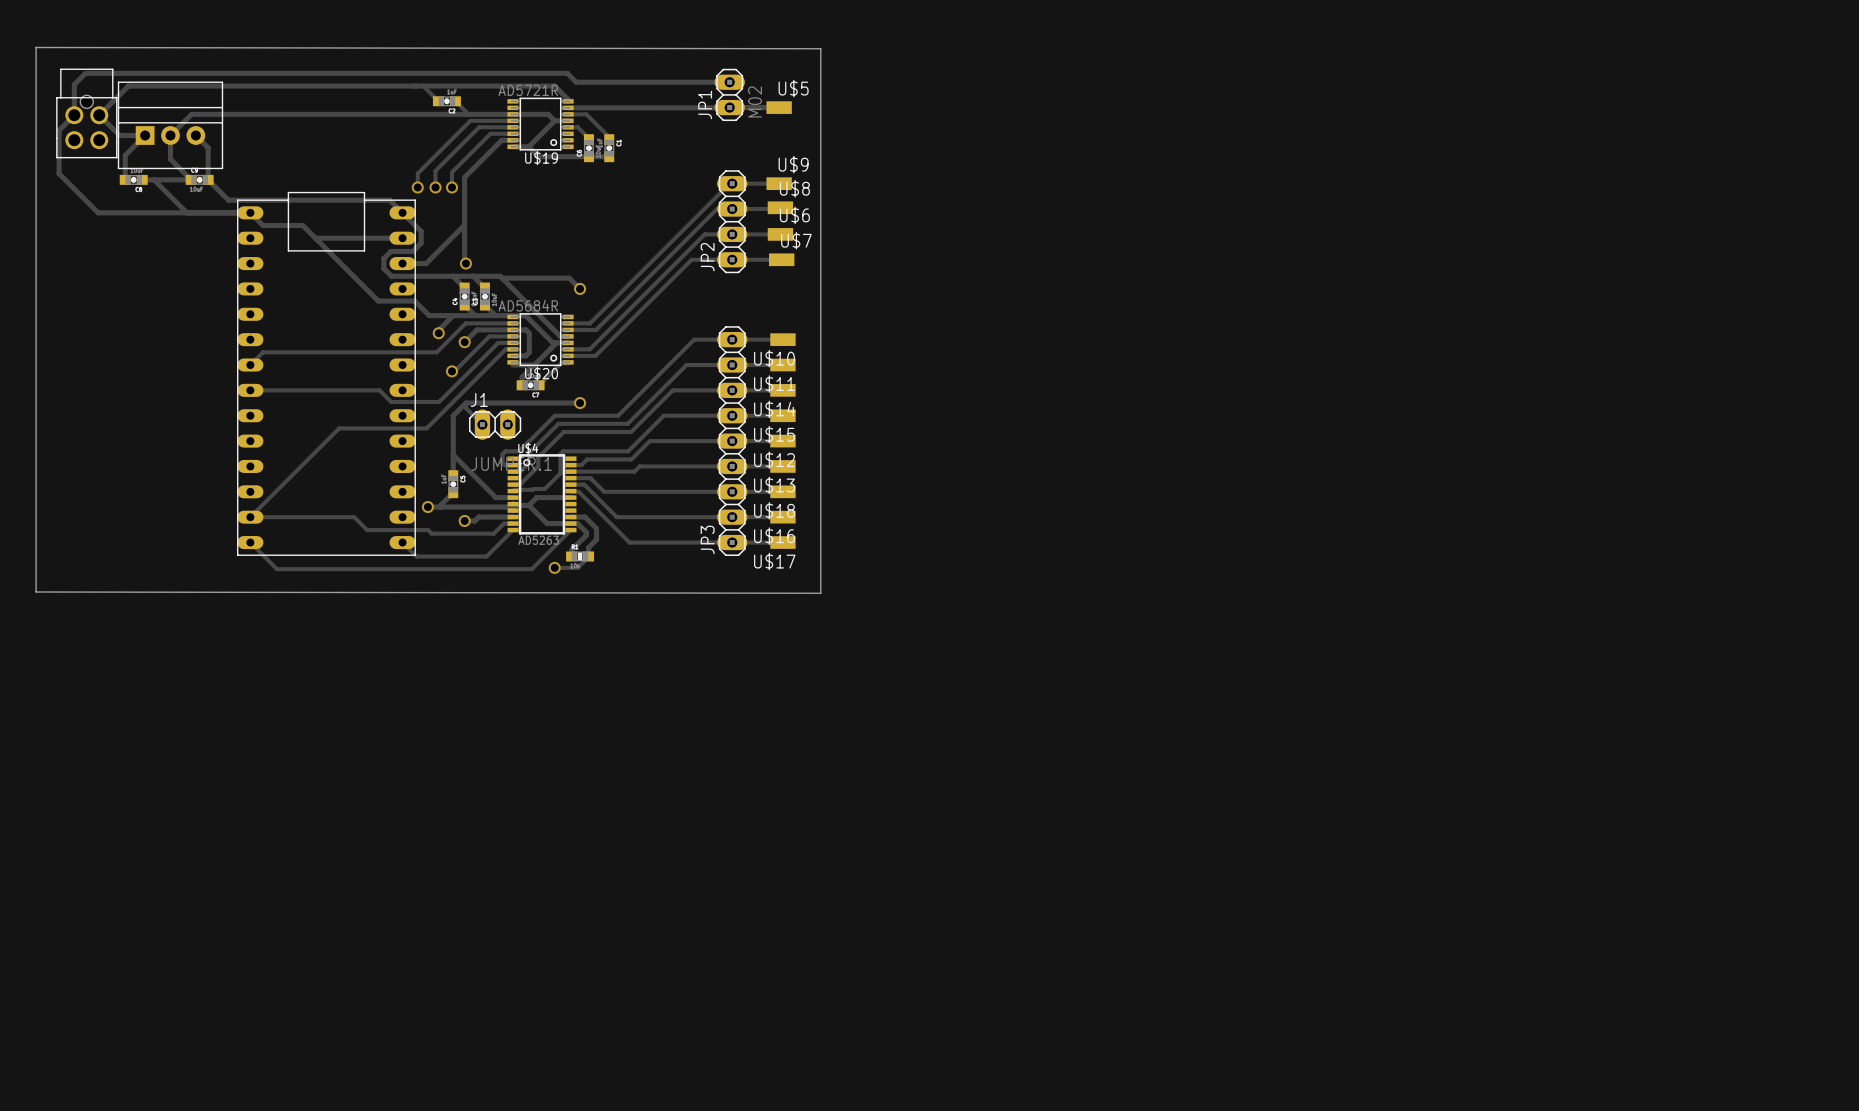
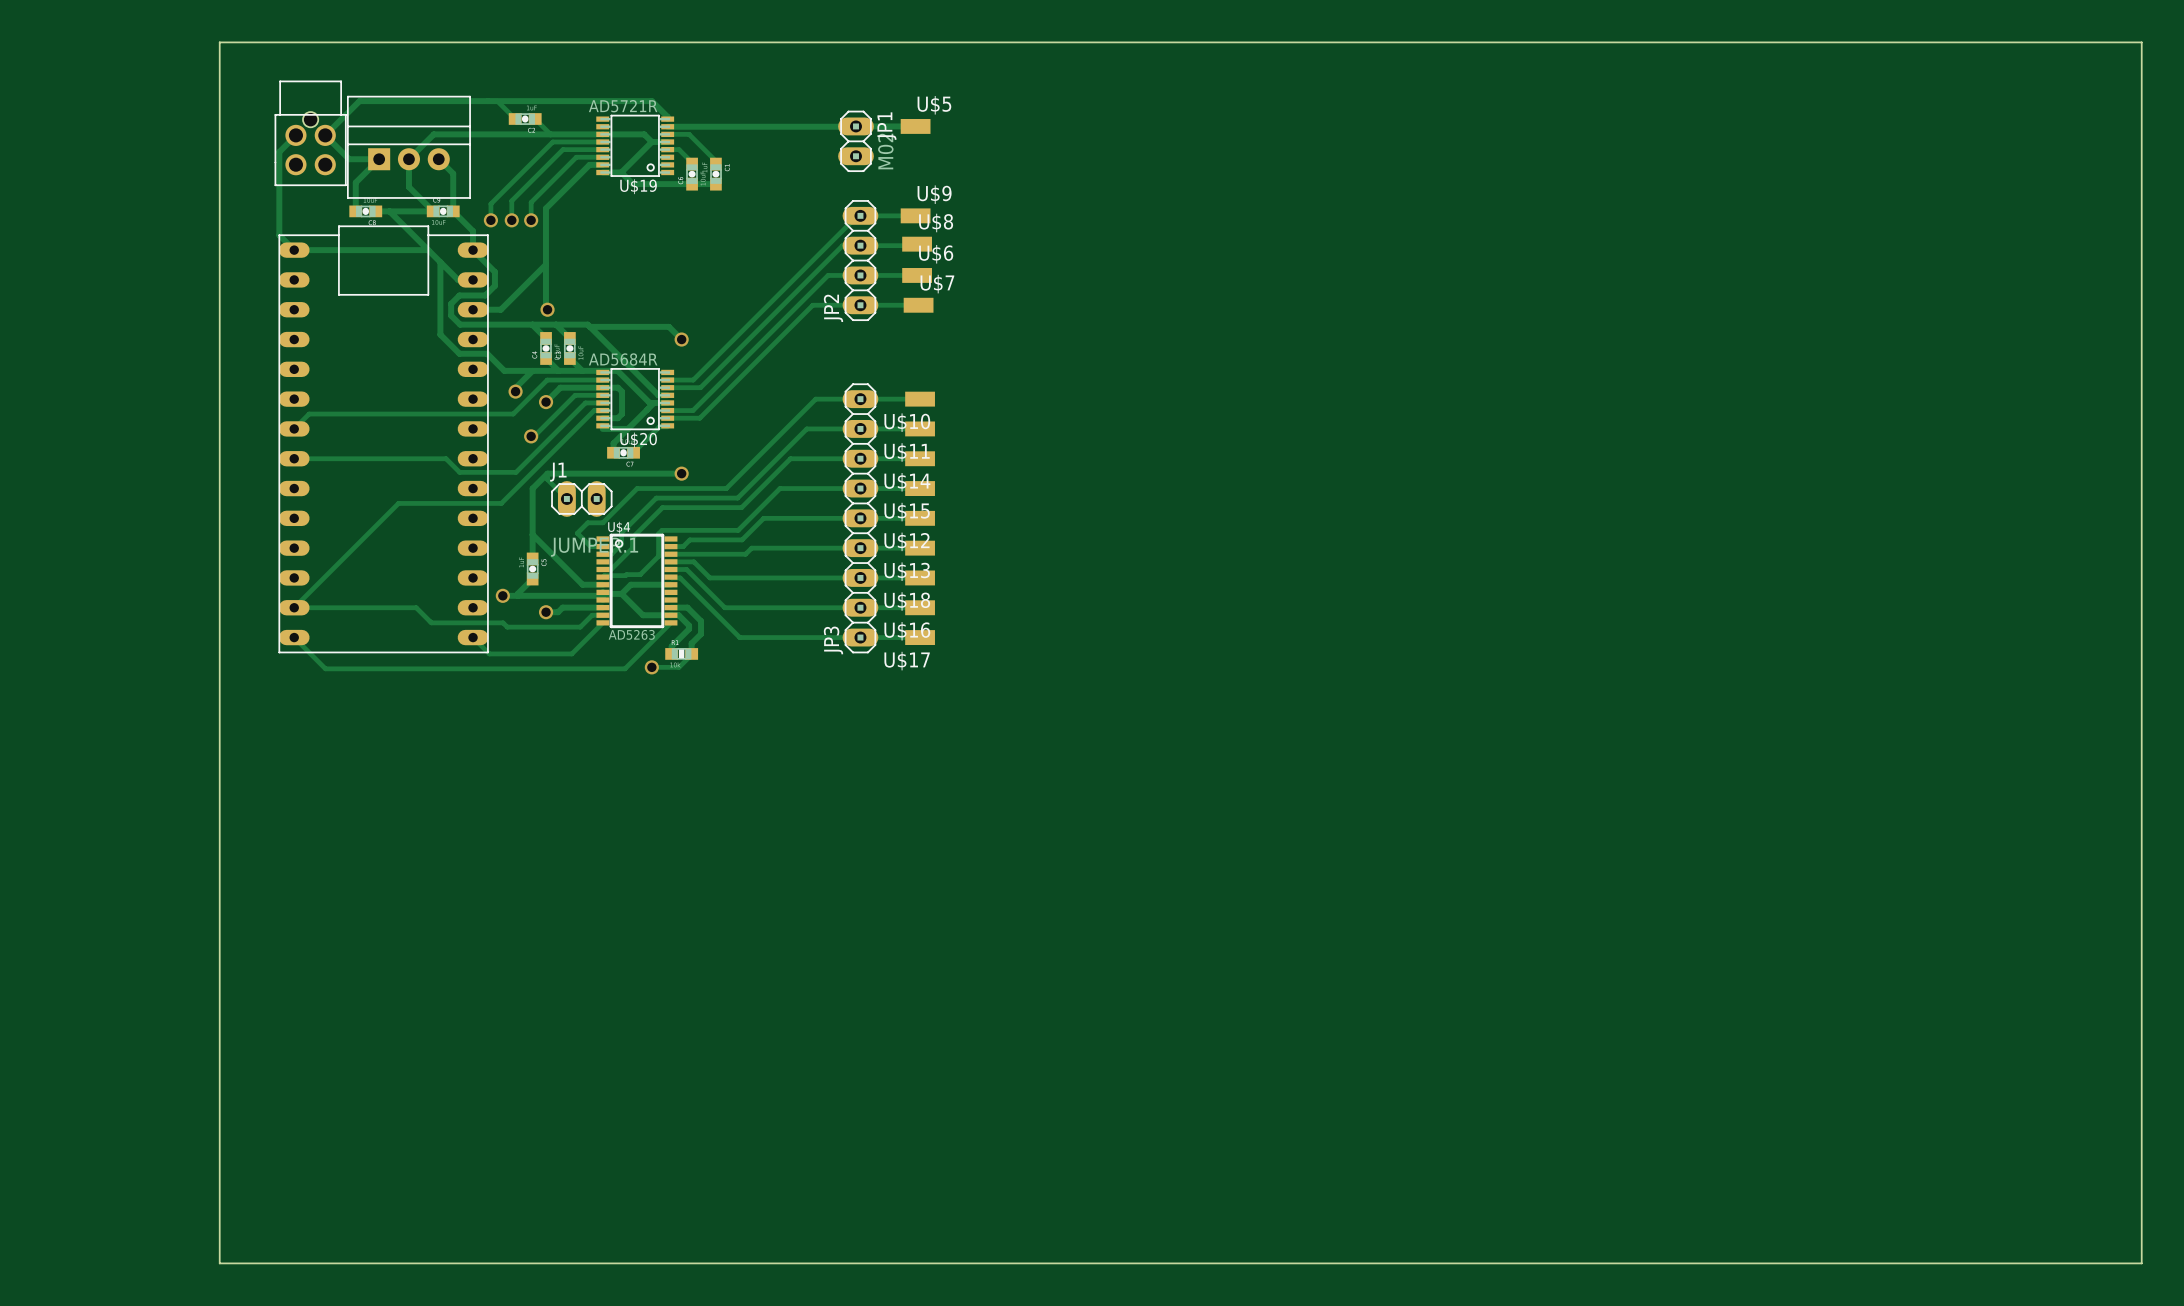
board edge: none -> (219, 42) (2141, 42) (2141, 1263) (219, 1263) (219, 42)
board edge: (36, 47) (820, 48) (820, 593) (36, 591) (36, 47) -> none
track: (729, 82) (576, 82) (567, 73) (85, 73) (74, 84) (74, 115) (59, 130) (59, 173) (98, 212) (250, 212) (263, 225) (302, 225) (378, 301) (390, 301) -> (440, 262) (440, 334) (459, 353)
track: (305, 86) (128, 86) (99, 115) (119, 135) (145, 135) (125, 155) (125, 179) -> (359, 101) (325, 135) (349, 159) (379, 159) (355, 182) (355, 211)
JP1 position: (729, 94) -> (856, 141)
JP1 name position: JP1 (705, 104) -> JP1 (886, 126)
part position: (86, 113) -> (310, 133)
track: (369, 114) (191, 114) (170, 135) (170, 159) (191, 179) (142, 179) -> (433, 134) (408, 159) (408, 187) (433, 211) (375, 211)
track: none -> (295, 135) (279, 152) (279, 235) (294, 250) (428, 250)
part position: (170, 125) -> (408, 147)
track: (195, 135) (208, 147) (208, 179) (228, 200) (389, 200) (402, 212) -> (438, 159) (453, 173) (453, 211) (473, 231) (473, 250)
part position: (133, 179) -> (365, 211)
track: (154, 179) (186, 212) -> none
part position: (199, 179) -> (443, 211)
track: (315, 238) (389, 238) -> (389, 211) (458, 279)
track: (554, 415) (525, 444) -> (652, 488) (637, 488) (602, 522) (587, 522) (577, 533) (590, 546) (593, 546)
track: (529, 441) (519, 451) (505, 451) (502, 454) (502, 463) (504, 465) -> none

